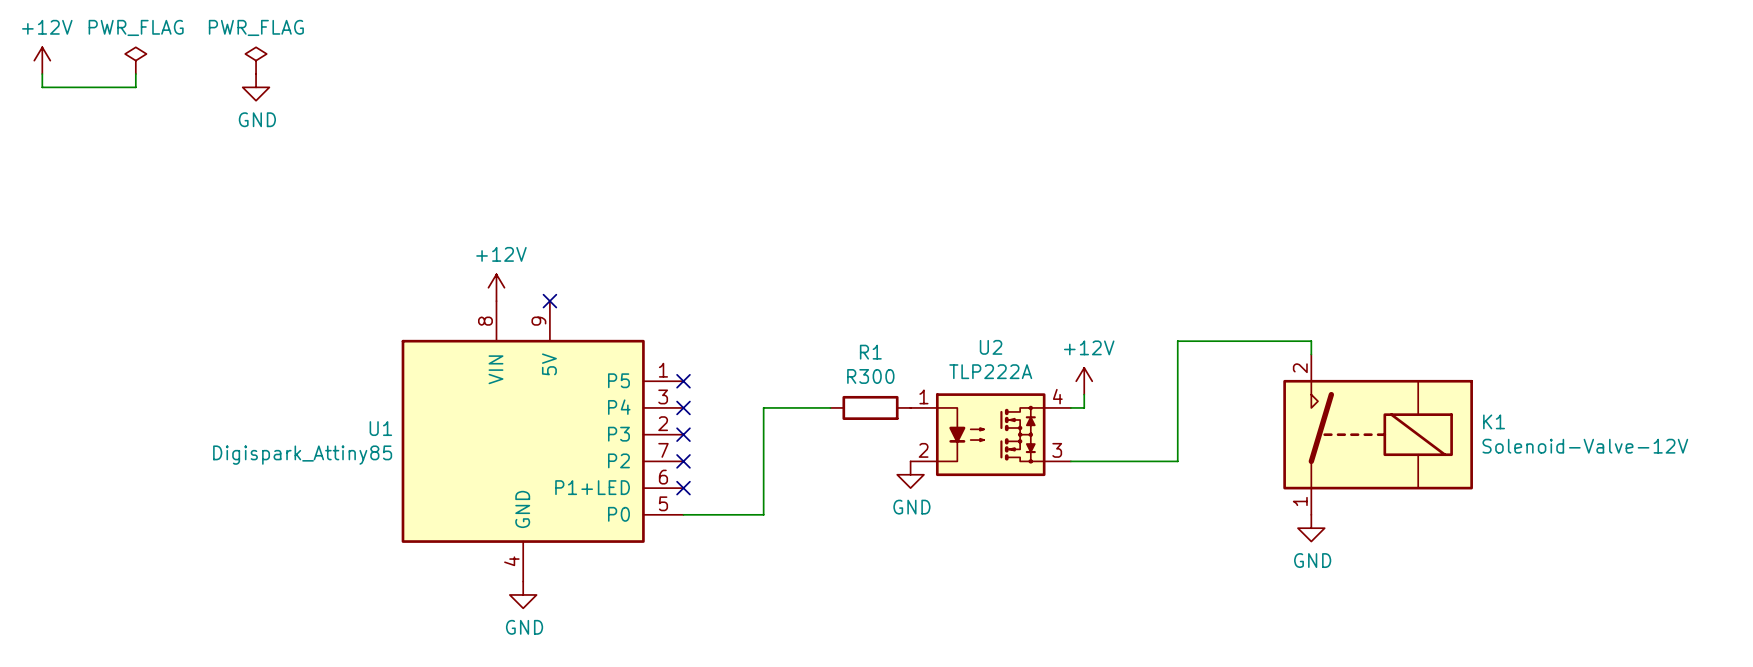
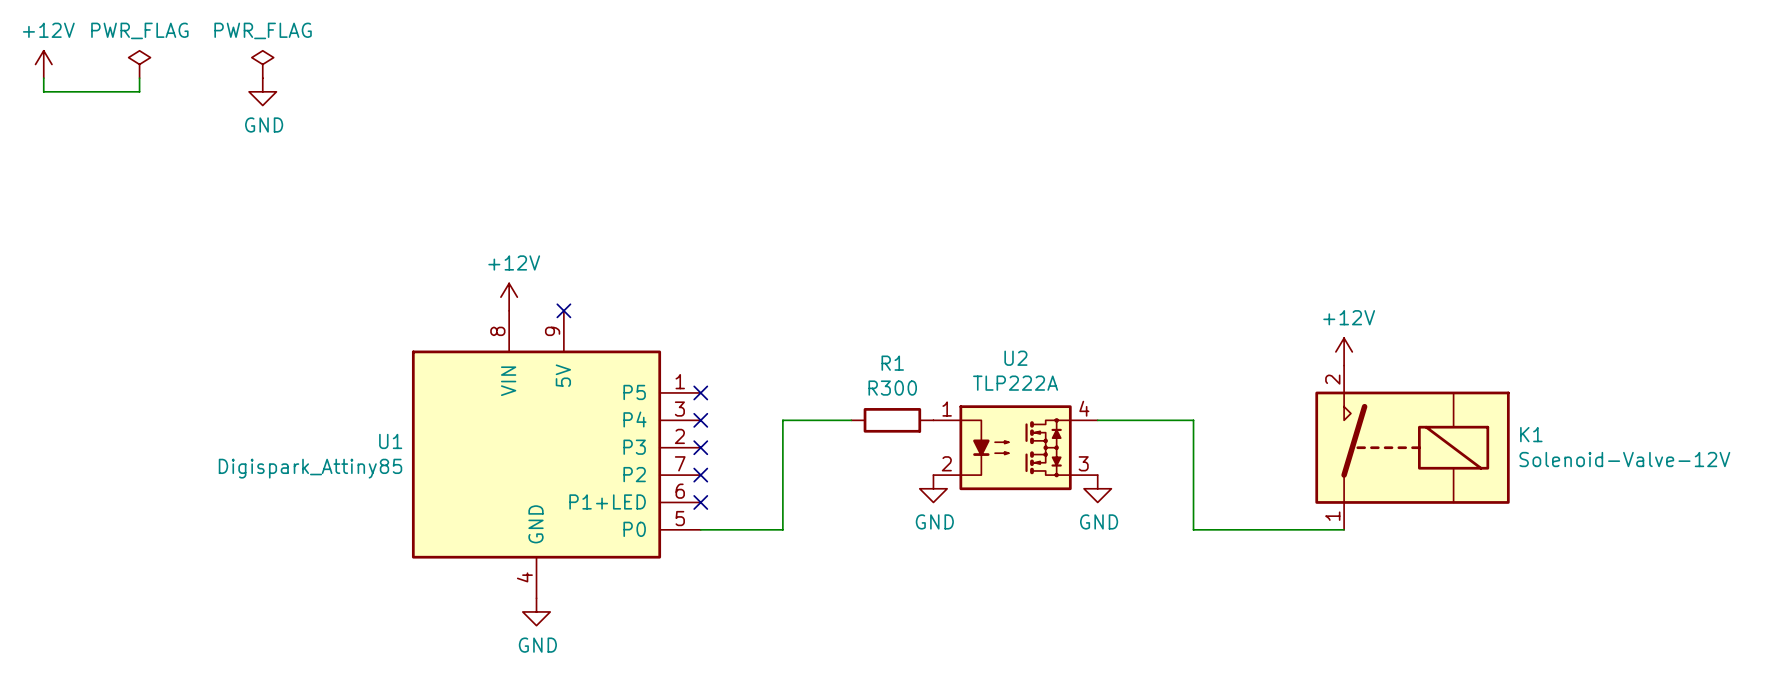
wire: (1311, 354) (1311, 341) (1177, 341) (1177, 461) (1070, 461) -> none
power symbol position: +12V (1084, 381) -> +12V (1344, 351)
wire: (1084, 394) (1084, 407) -> (1344, 529) (1193, 529) (1193, 420) (1111, 420)
power symbol position: GND (1311, 528) -> GND (1097, 488)

